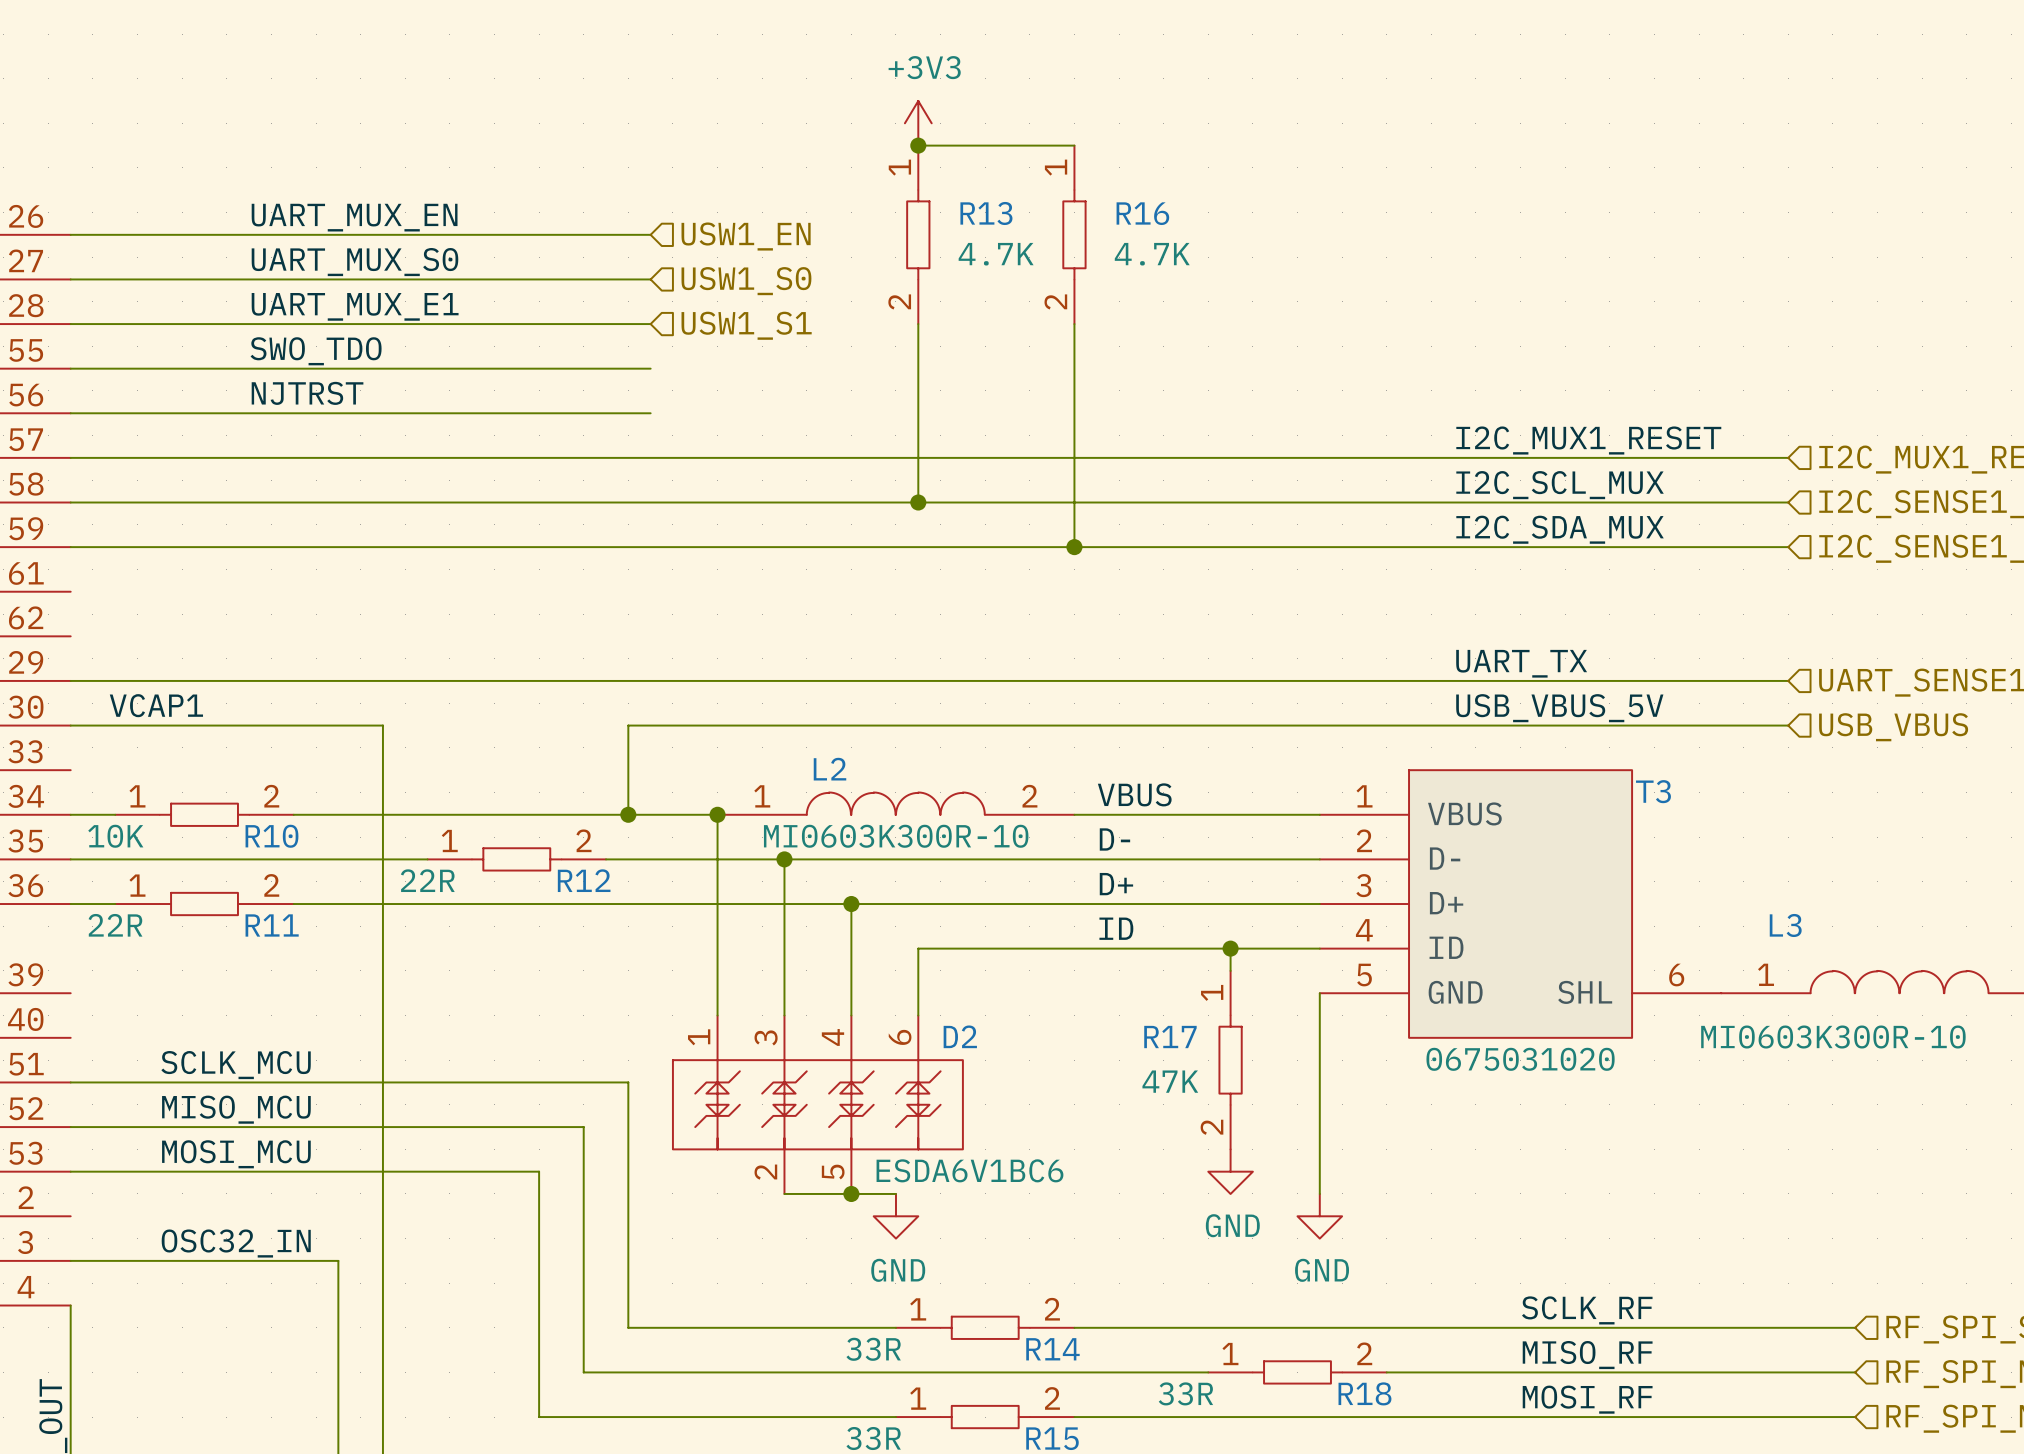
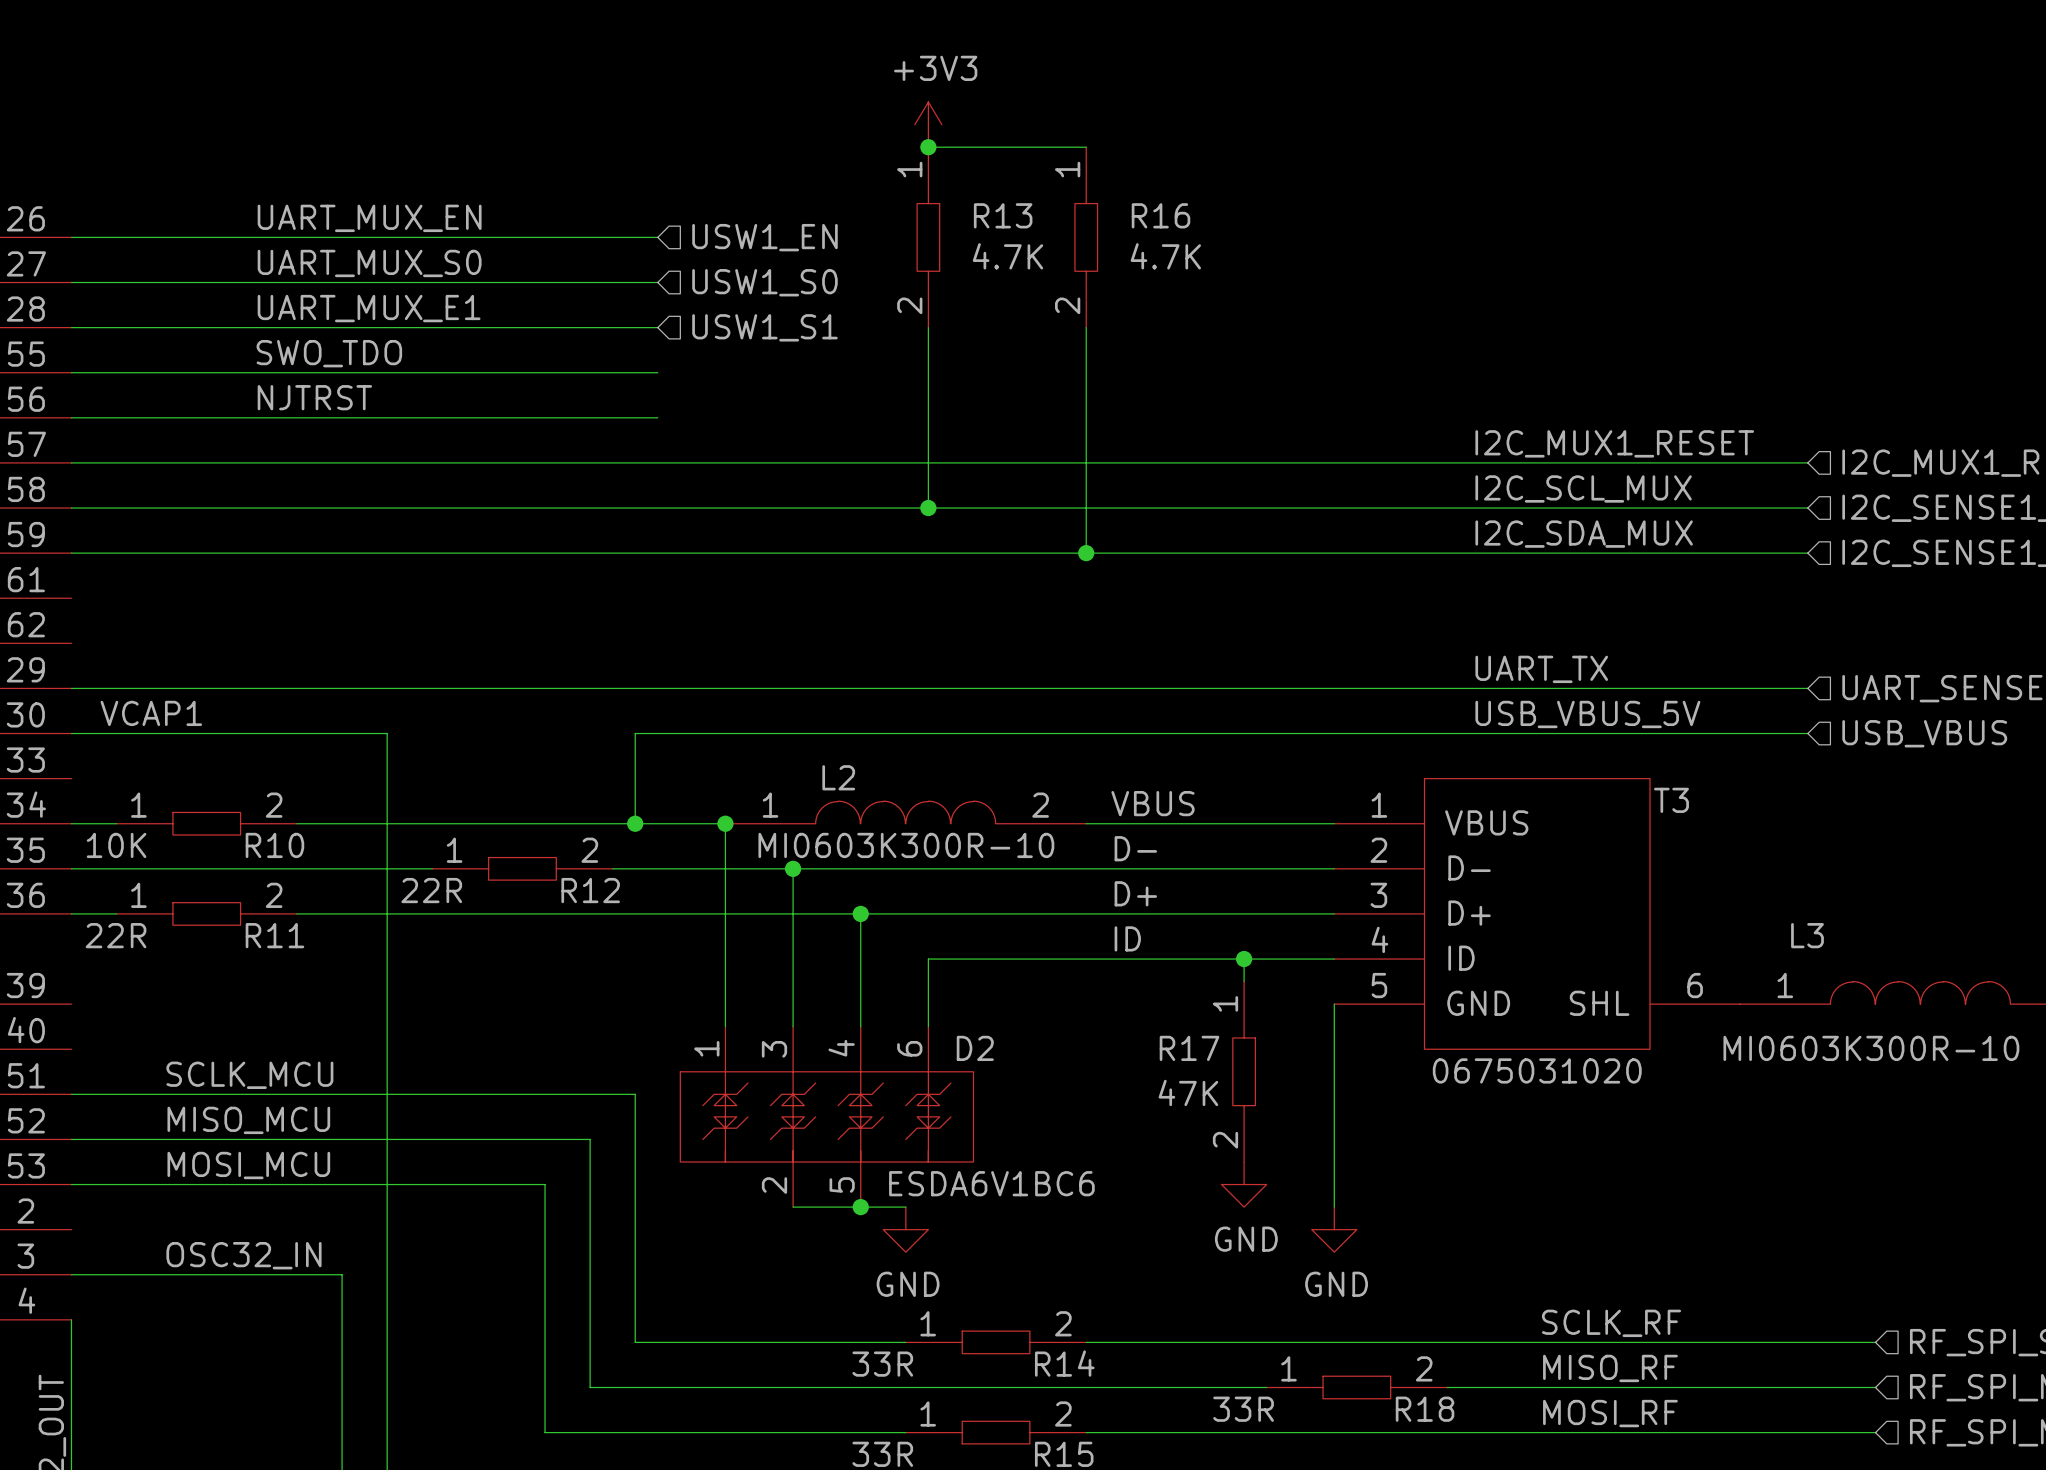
R18 position: (1297, 1372) -> (1356, 1387)

